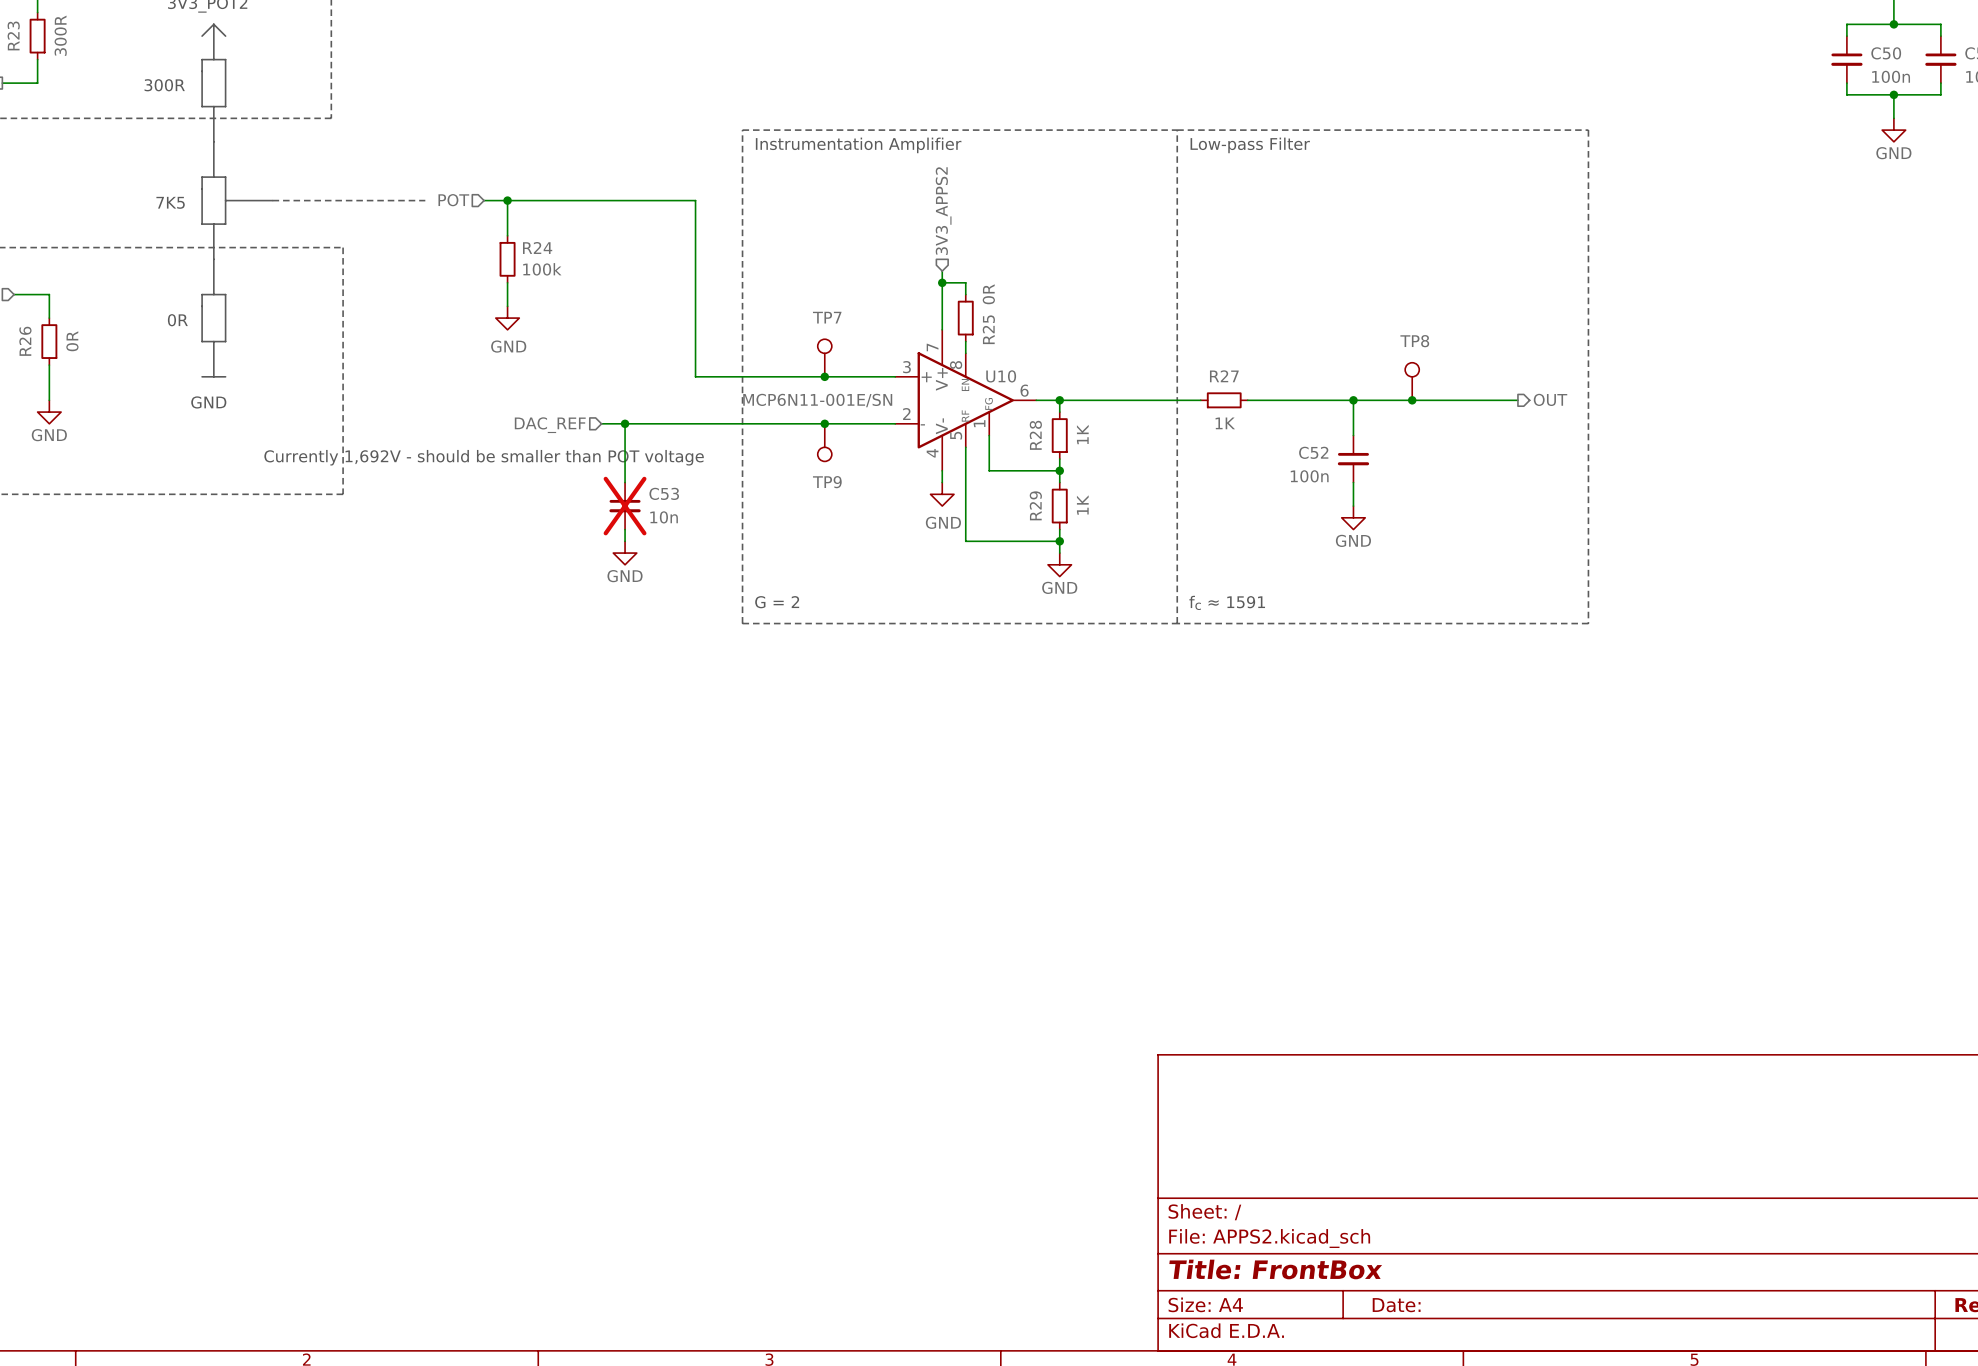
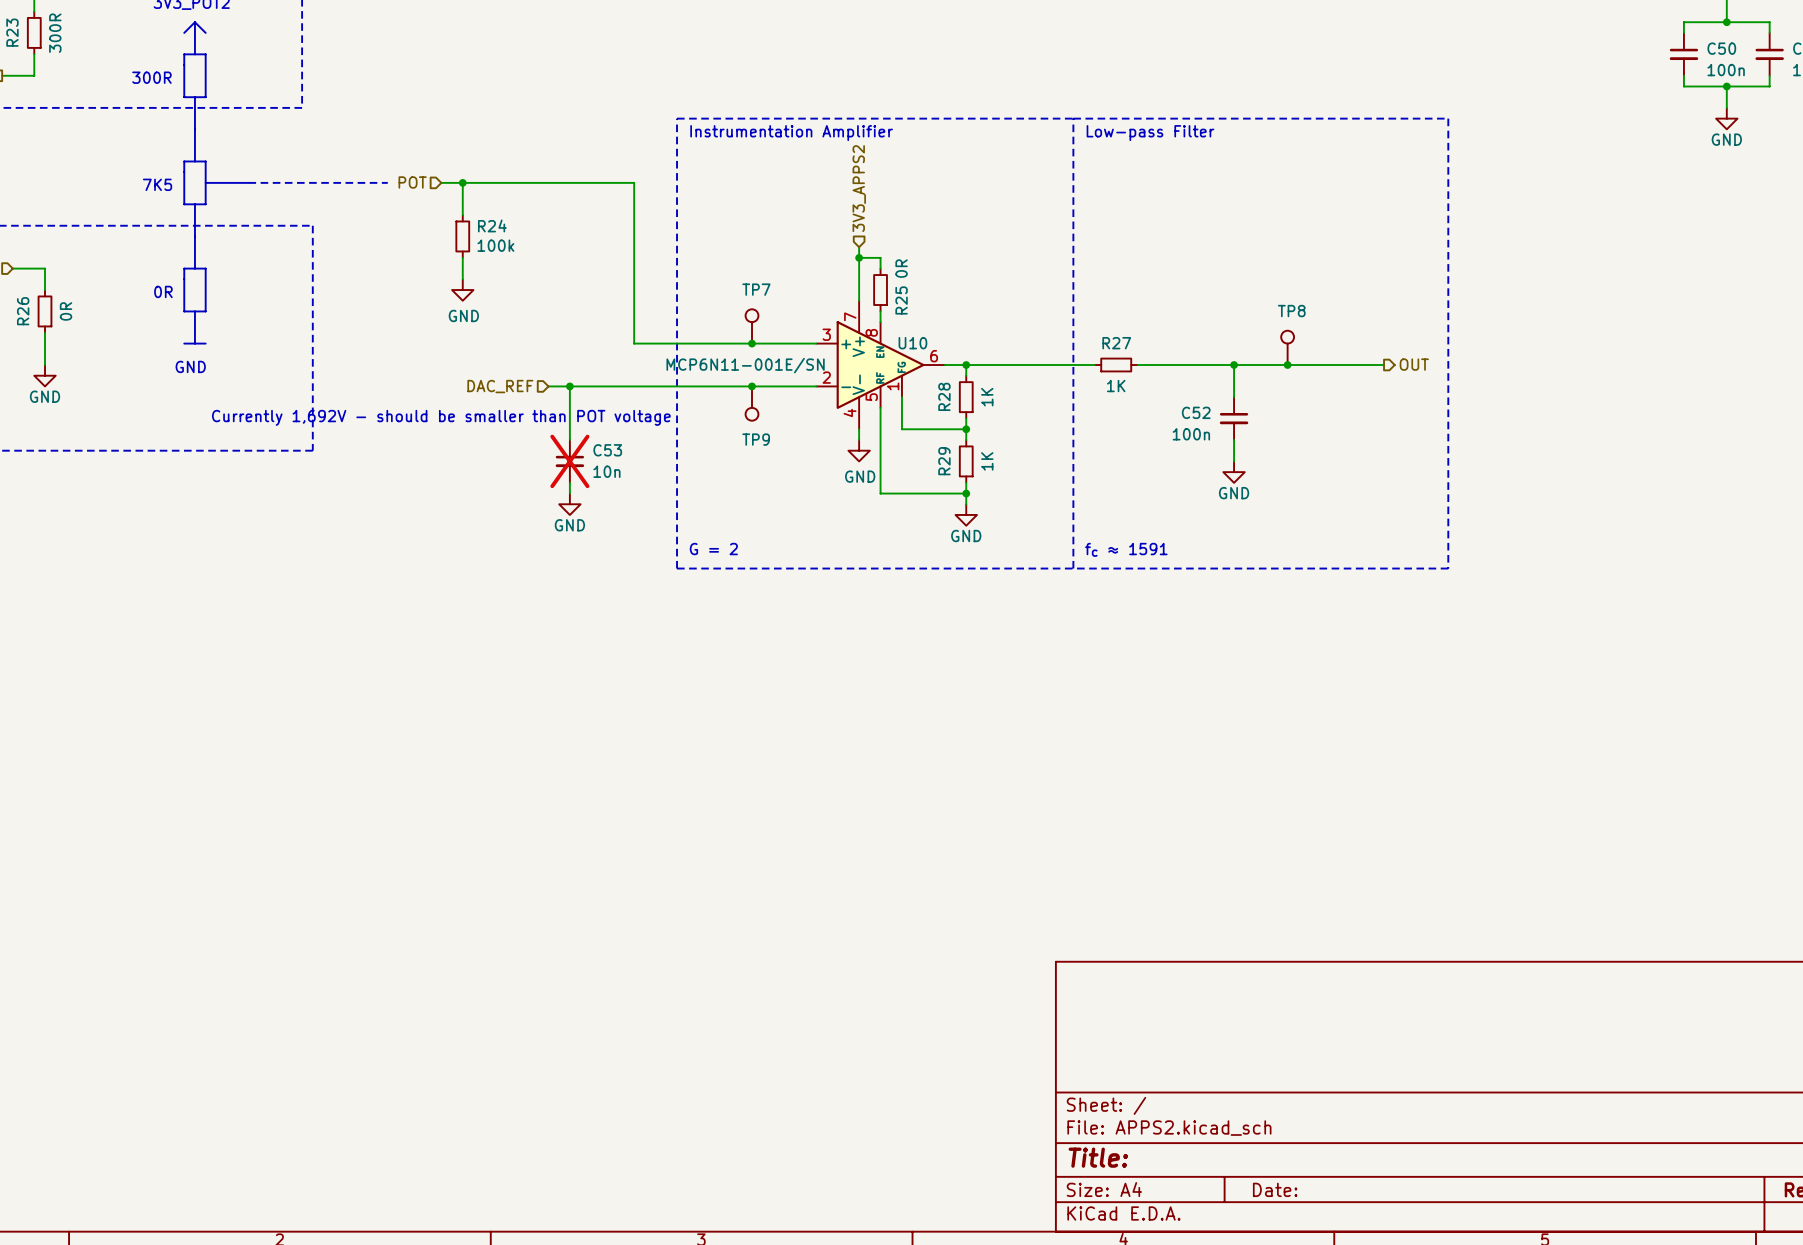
title block: Title: FrontBox (1275, 1269) -> Title: (1098, 1157)

